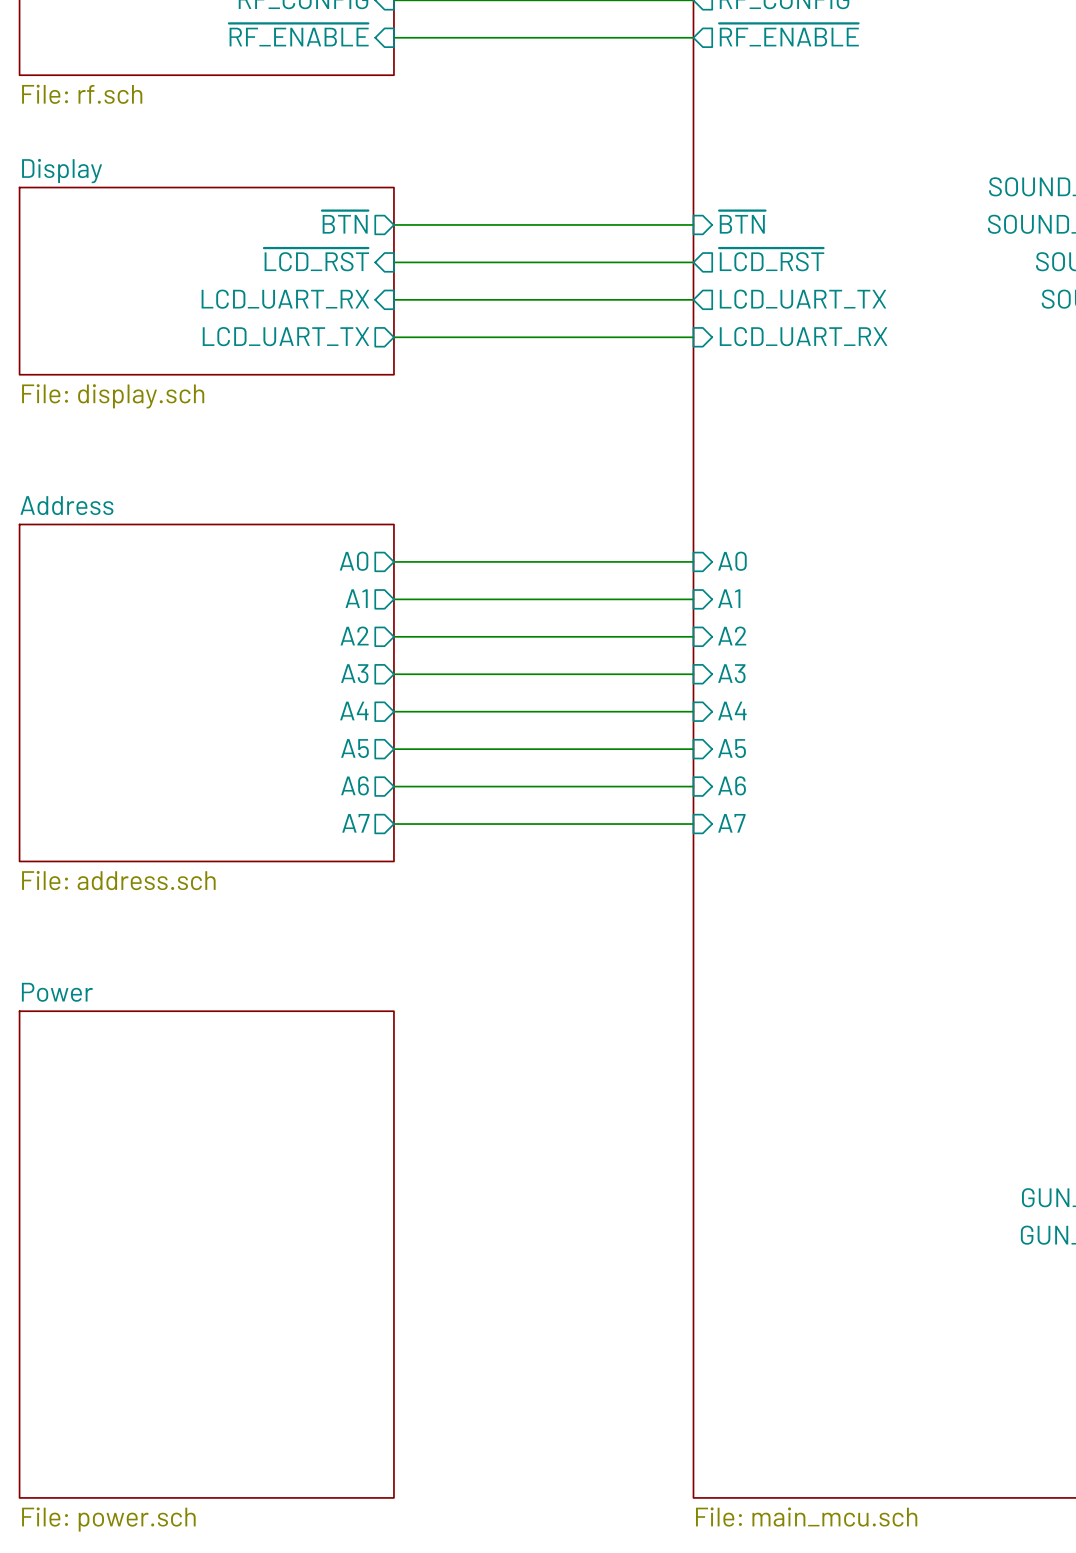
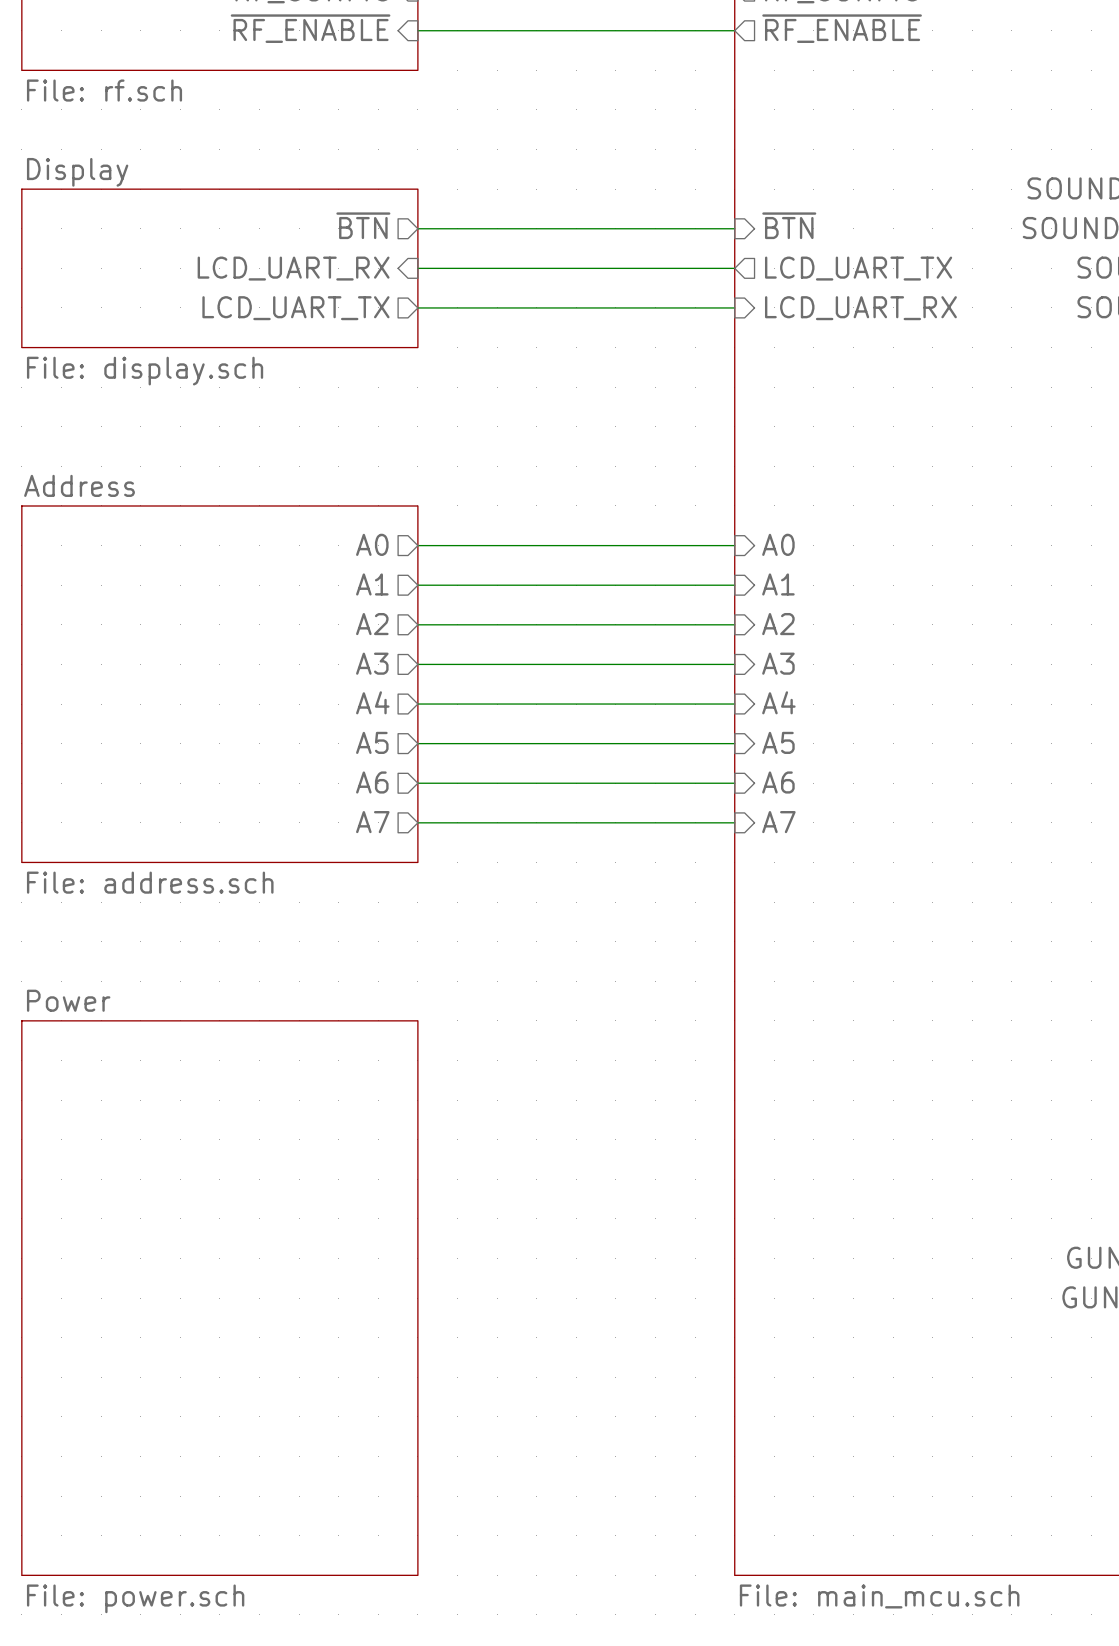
sheet pin: ~{LCD_RST} (316, 259) -> LCD_UART_RX (293, 268)
sheet pin: ~{LCD_RST} (771, 259) -> LCD_UART_TX (858, 268)
sheet Display: none -> File: display.sch (219, 268)
sheet Display: File: display.sch (206, 281) -> none
sheet pin shape: input (285, 299) -> output (295, 308)
sheet pin: LCD_UART_RX (285, 299) -> LCD_UART_TX (295, 308)
sheet pin shape: output (802, 299) -> input (860, 308)
sheet pin: LCD_UART_TX (802, 299) -> LCD_UART_RX (860, 308)
sheet pin: LCD_UART_TX (285, 336) -> none
sheet pin: LCD_UART_RX (803, 336) -> none
wire: (393, 337) (693, 337) -> (417, 545) (734, 545)
sheet pin: none -> A0 (372, 544)
sheet pin: none -> A0 (778, 544)
sheet pin: A0 (354, 561) -> A1 (372, 584)
sheet pin: A0 (732, 561) -> A1 (778, 584)
sheet pin: A1 (356, 598) -> A2 (372, 624)
sheet pin: A1 (729, 598) -> A2 (778, 624)
sheet pin: A2 (354, 636) -> A3 (372, 663)
sheet pin: A2 (732, 636) -> A3 (778, 663)
sheet pin: A3 (354, 673) -> A4 (372, 702)
sheet pin: A3 (731, 673) -> A4 (778, 702)
sheet Address position: (206, 692) -> (219, 684)
sheet pin: A4 (354, 710) -> A5 (372, 742)
sheet pin: A4 (732, 710) -> A5 (778, 742)
sheet pin: A5 (354, 748) -> A6 (372, 782)
sheet pin: A5 (732, 748) -> A6 (778, 782)
sheet pin: A6 (354, 785) -> A7 (372, 822)
sheet pin: A6 (732, 785) -> A7 (778, 822)
sheet pin: A7 (355, 823) -> none
sheet pin: A7 (731, 823) -> none
wire: (393, 824) (693, 824) -> none
sheet Power: none -> File: power.sch (219, 1298)
sheet Power: File: power.sch (206, 1254) -> none

